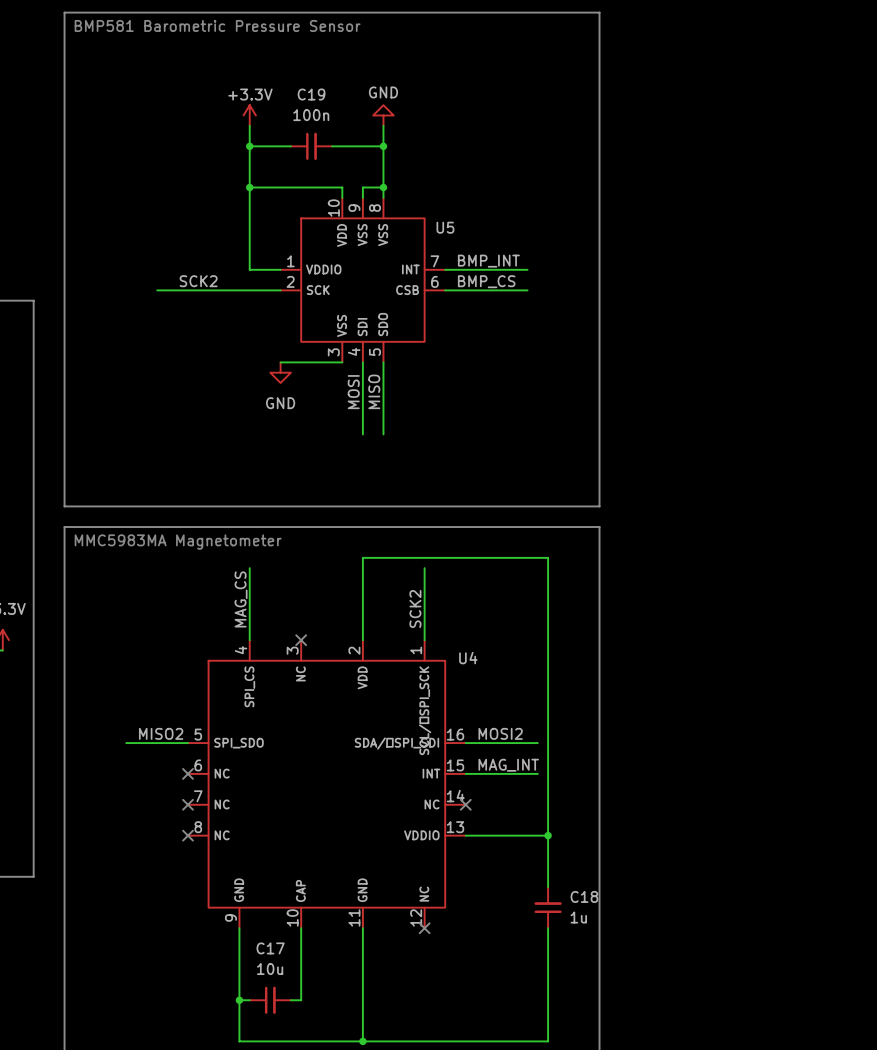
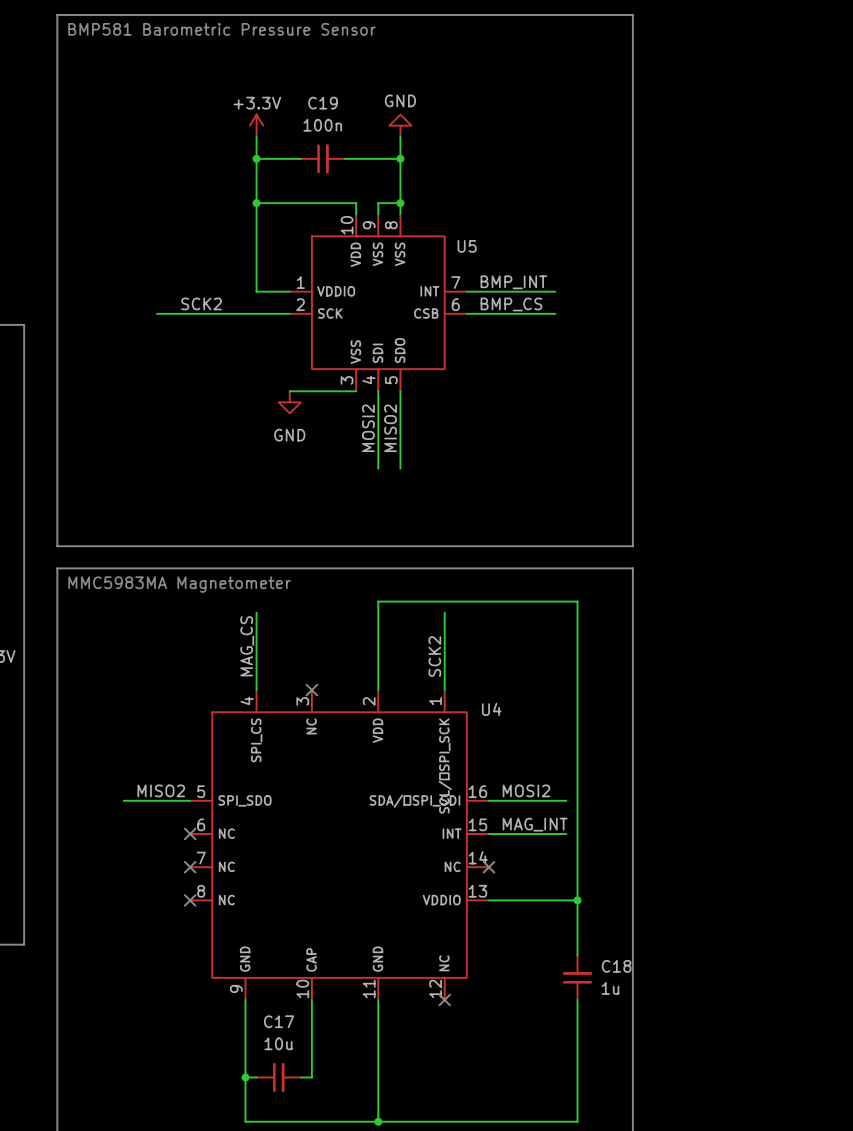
label: MISO (374, 391) -> MISO2 (390, 428)
label: MOSI (353, 392) -> MOSI2 (368, 428)

